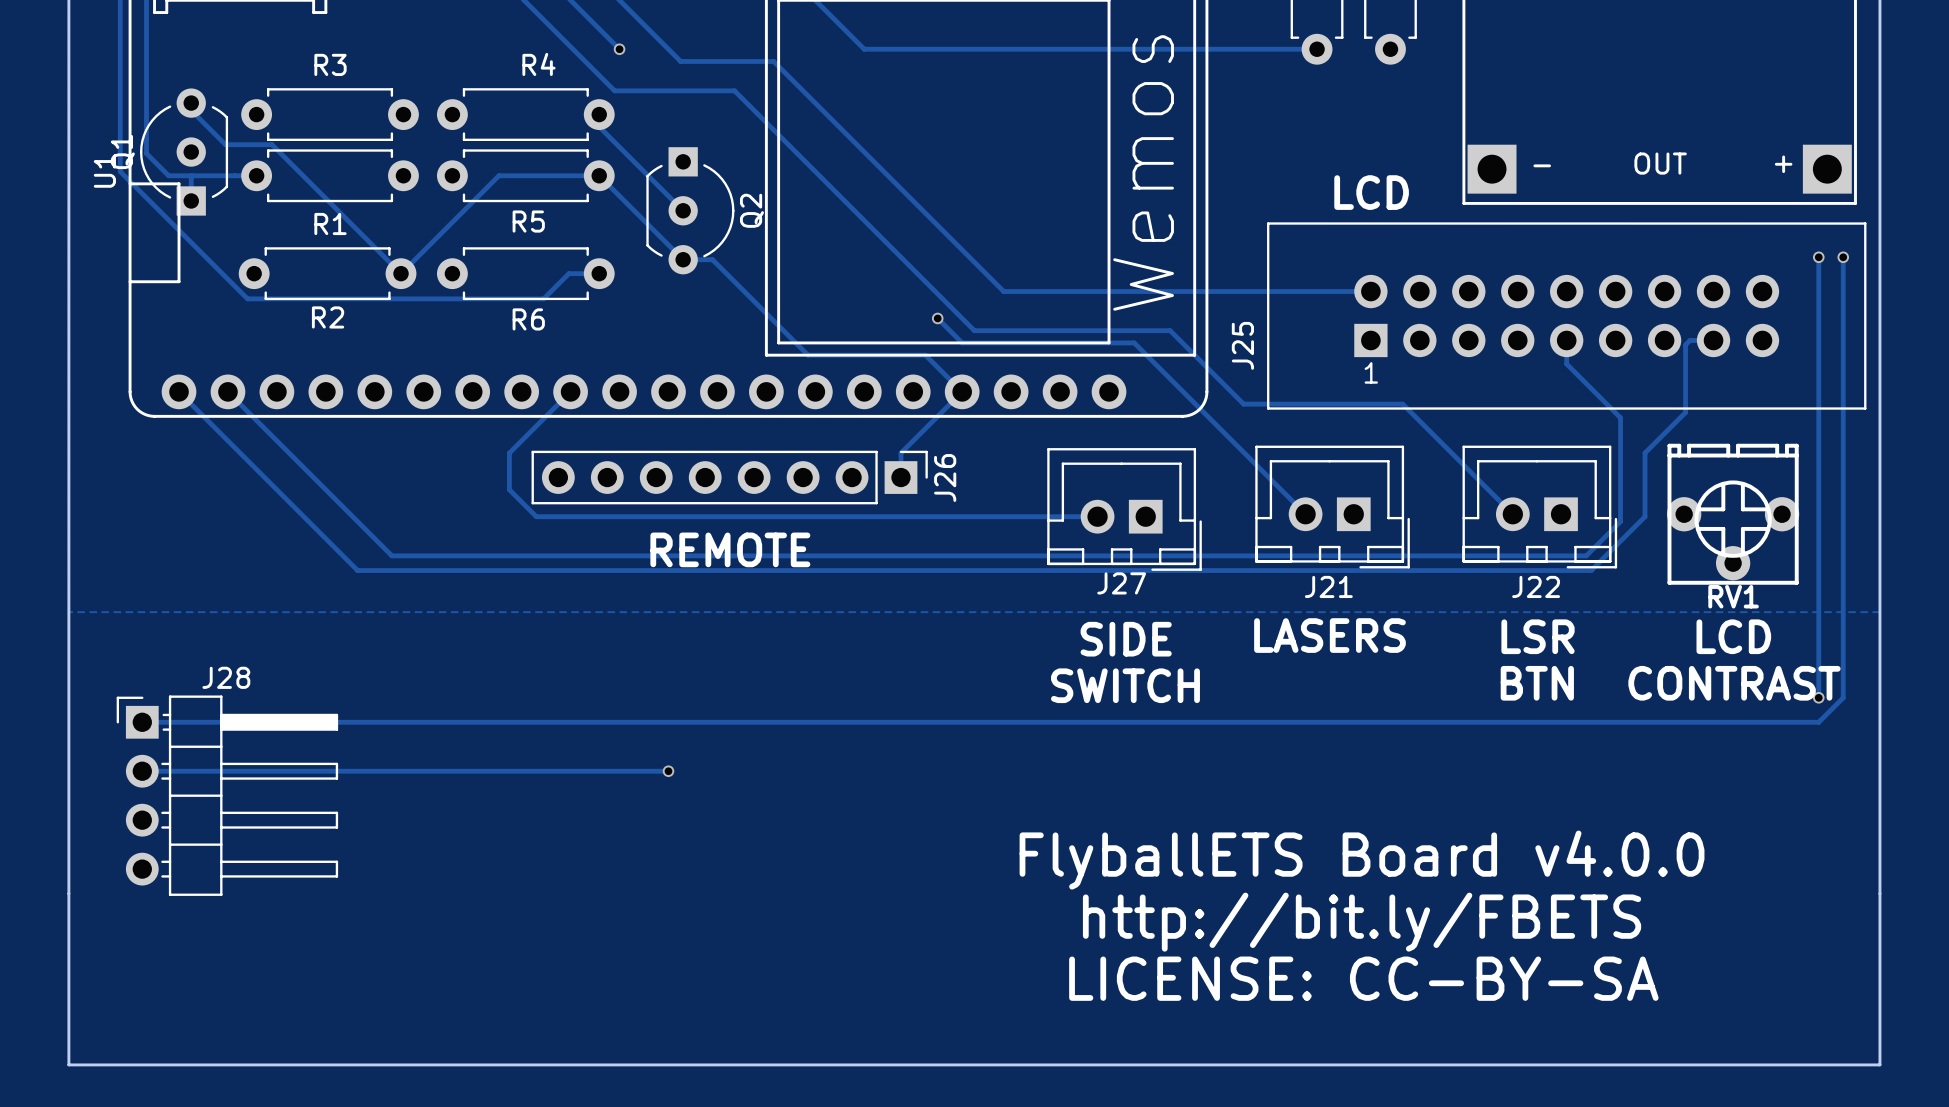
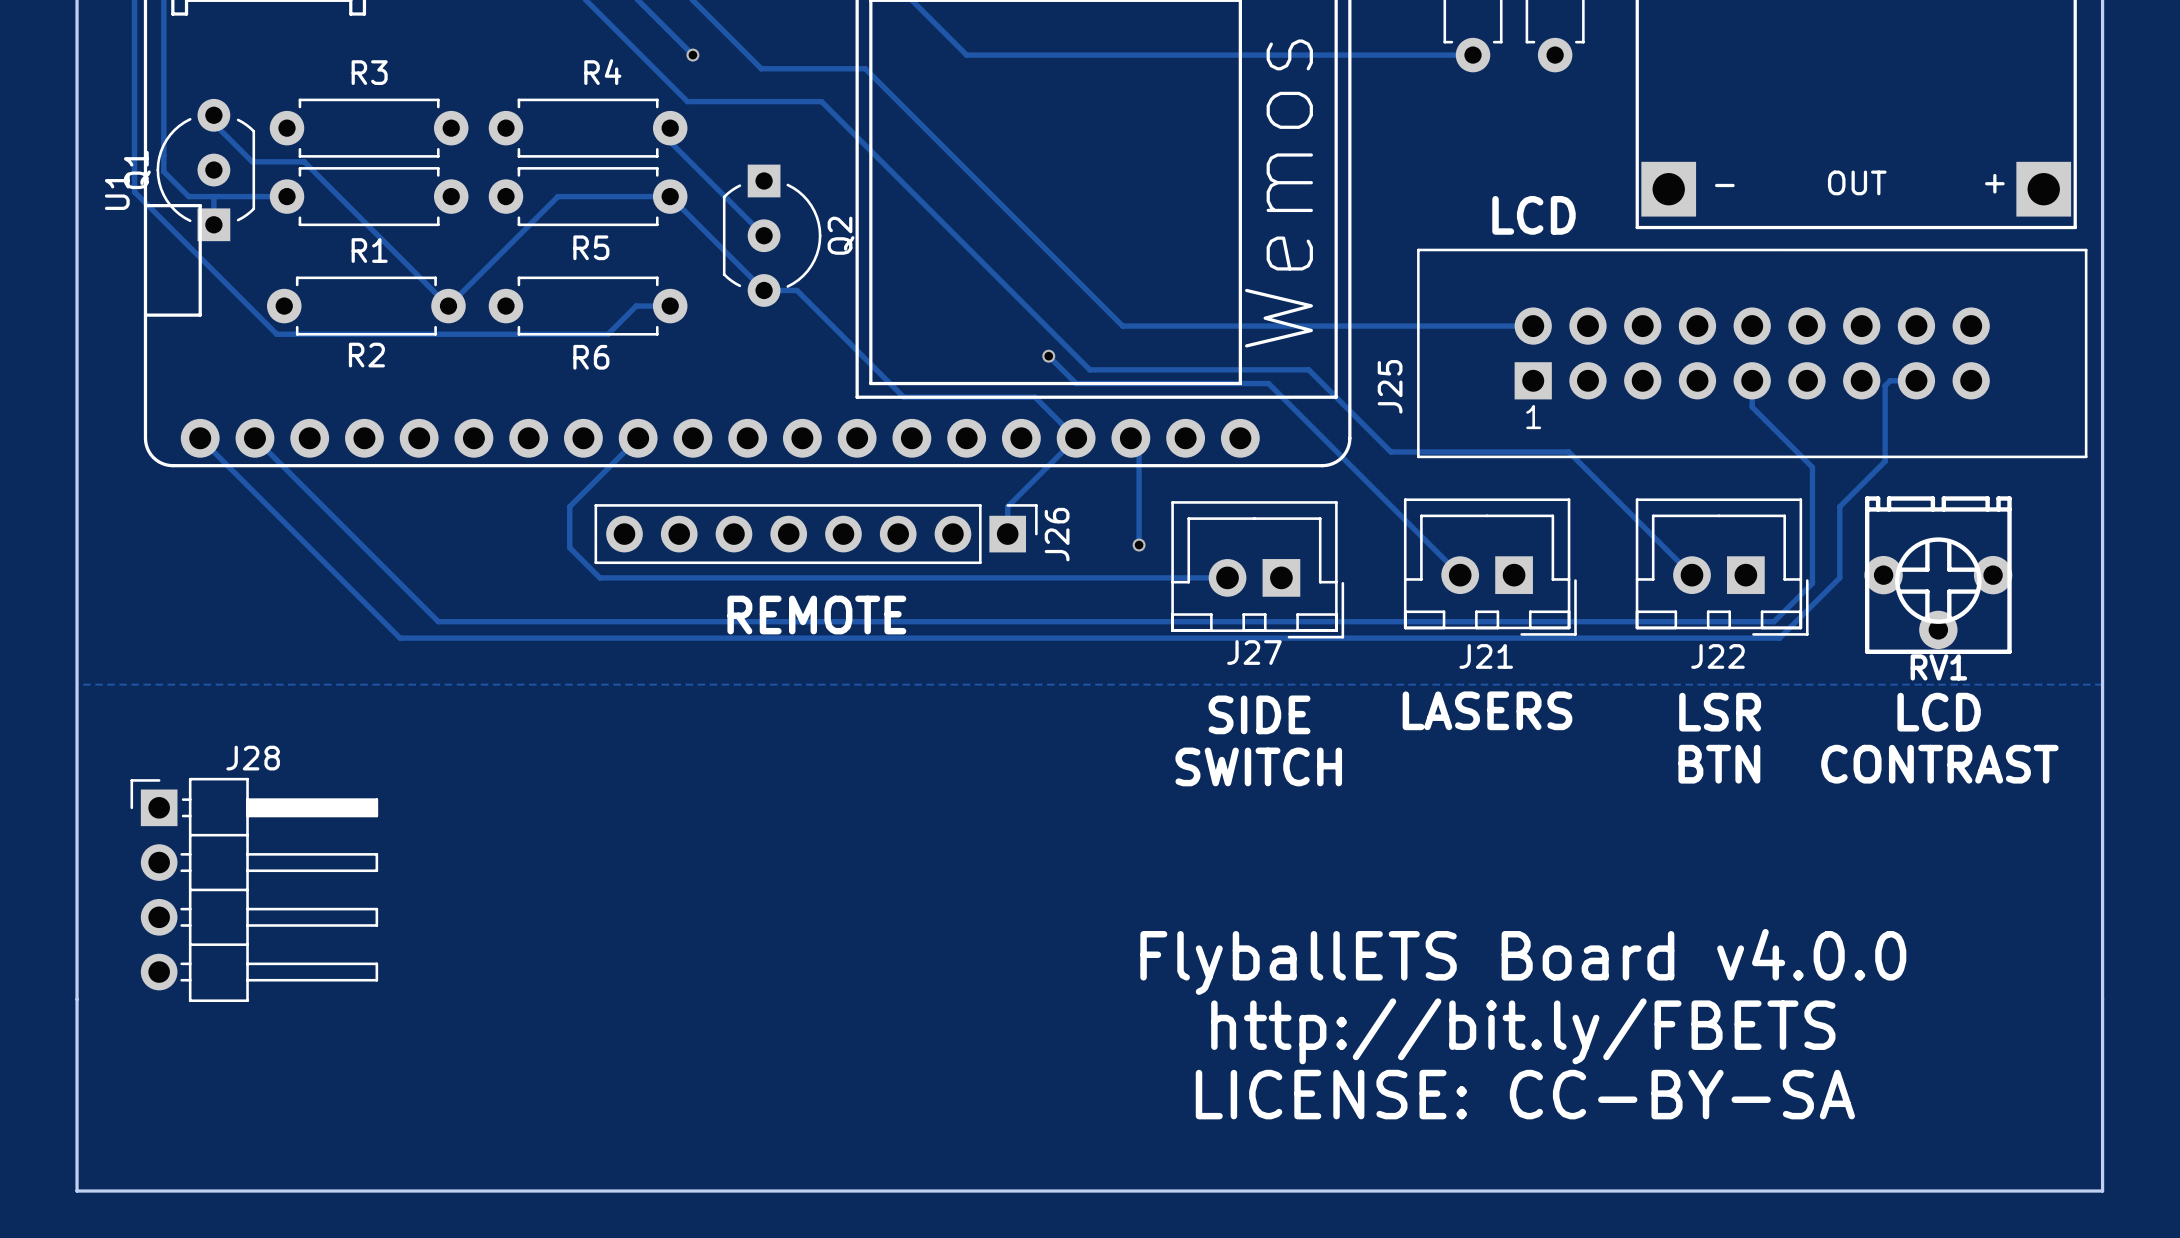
track: (1818, 257) (1818, 697) -> none
via: (1818, 257) -> none
track: (1843, 257) (1843, 697) (1818, 722) (142, 722) -> none
via: (1843, 257) -> none
track: none -> (1139, 446) (1139, 545)
via: none -> (1139, 545)
via: (1818, 697) -> none
track: (142, 771) (668, 771) -> none
via: (668, 771) -> none

